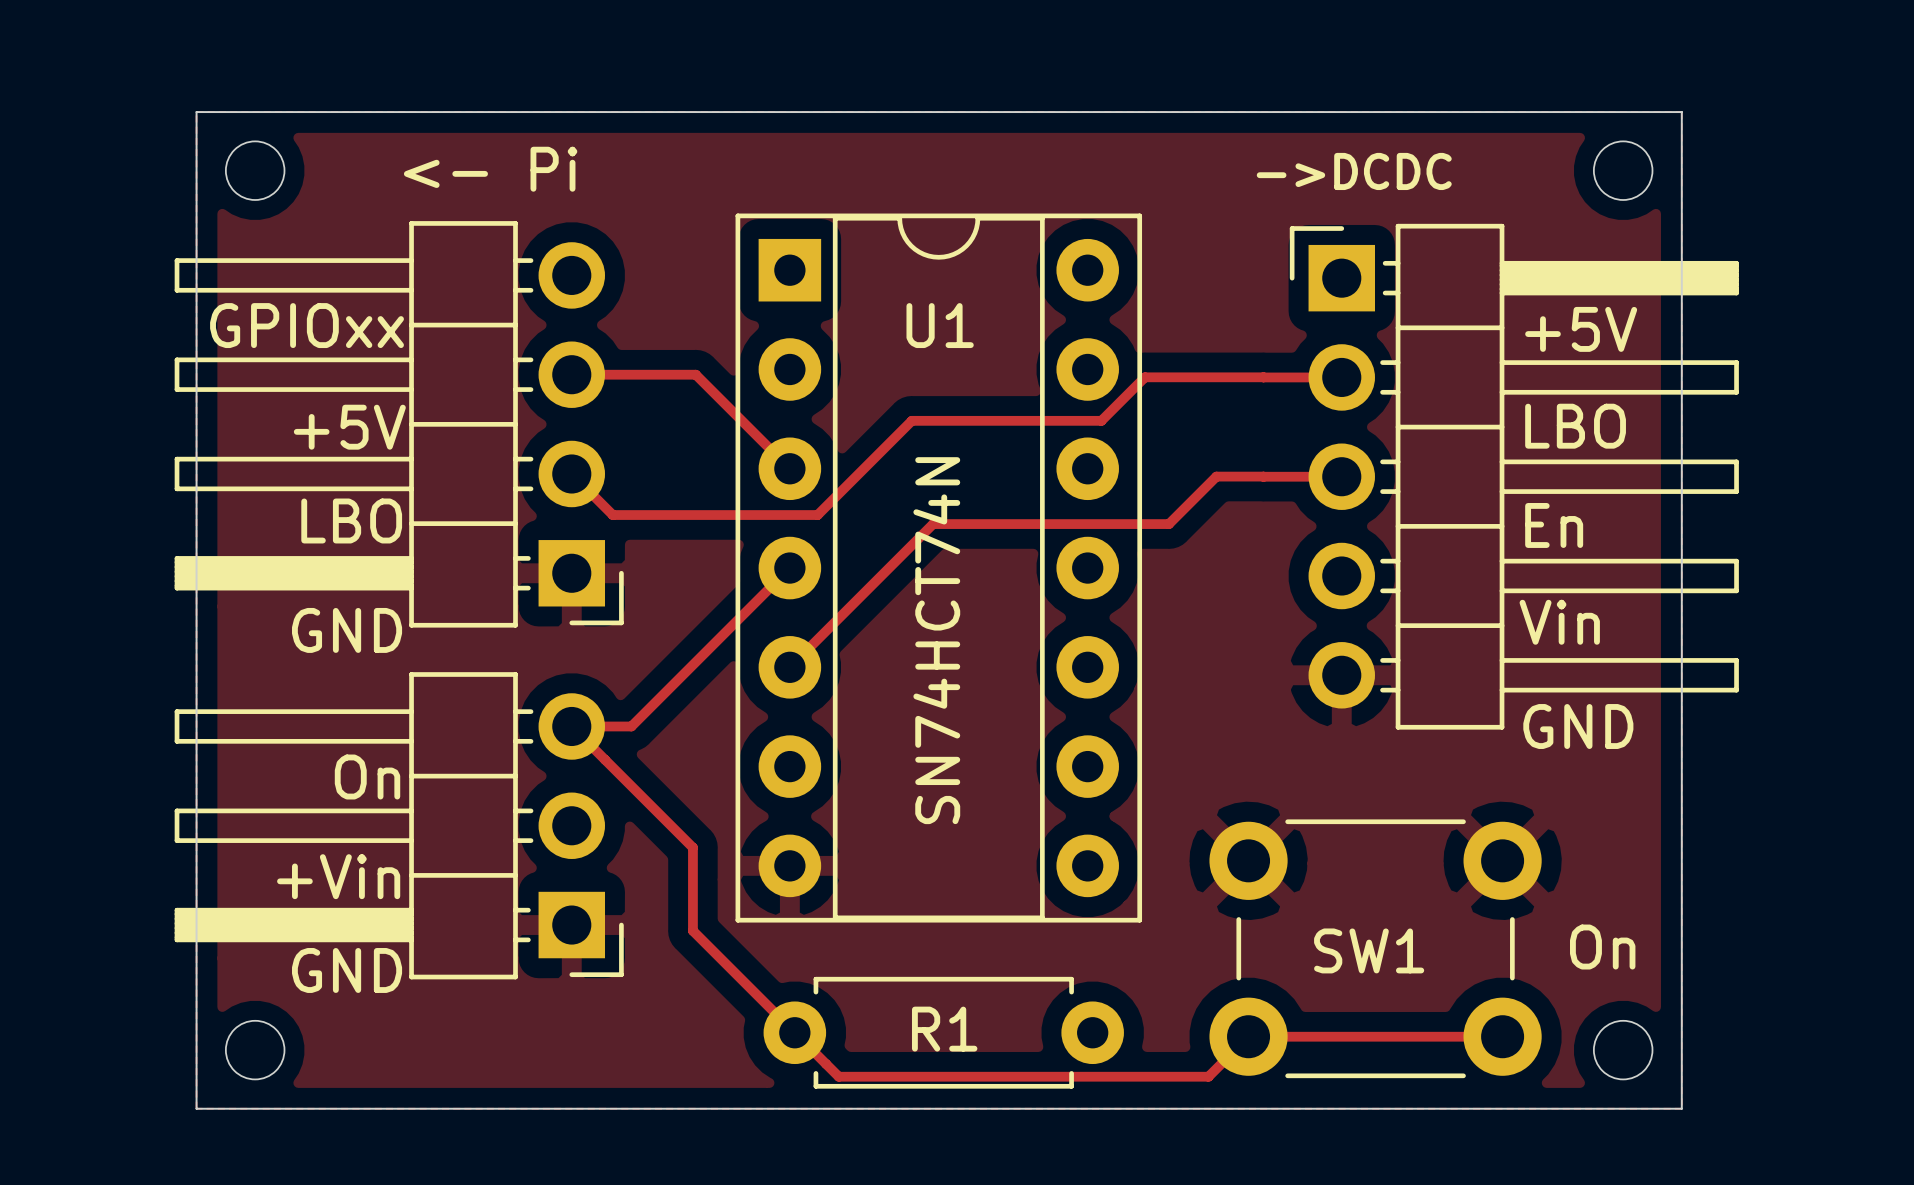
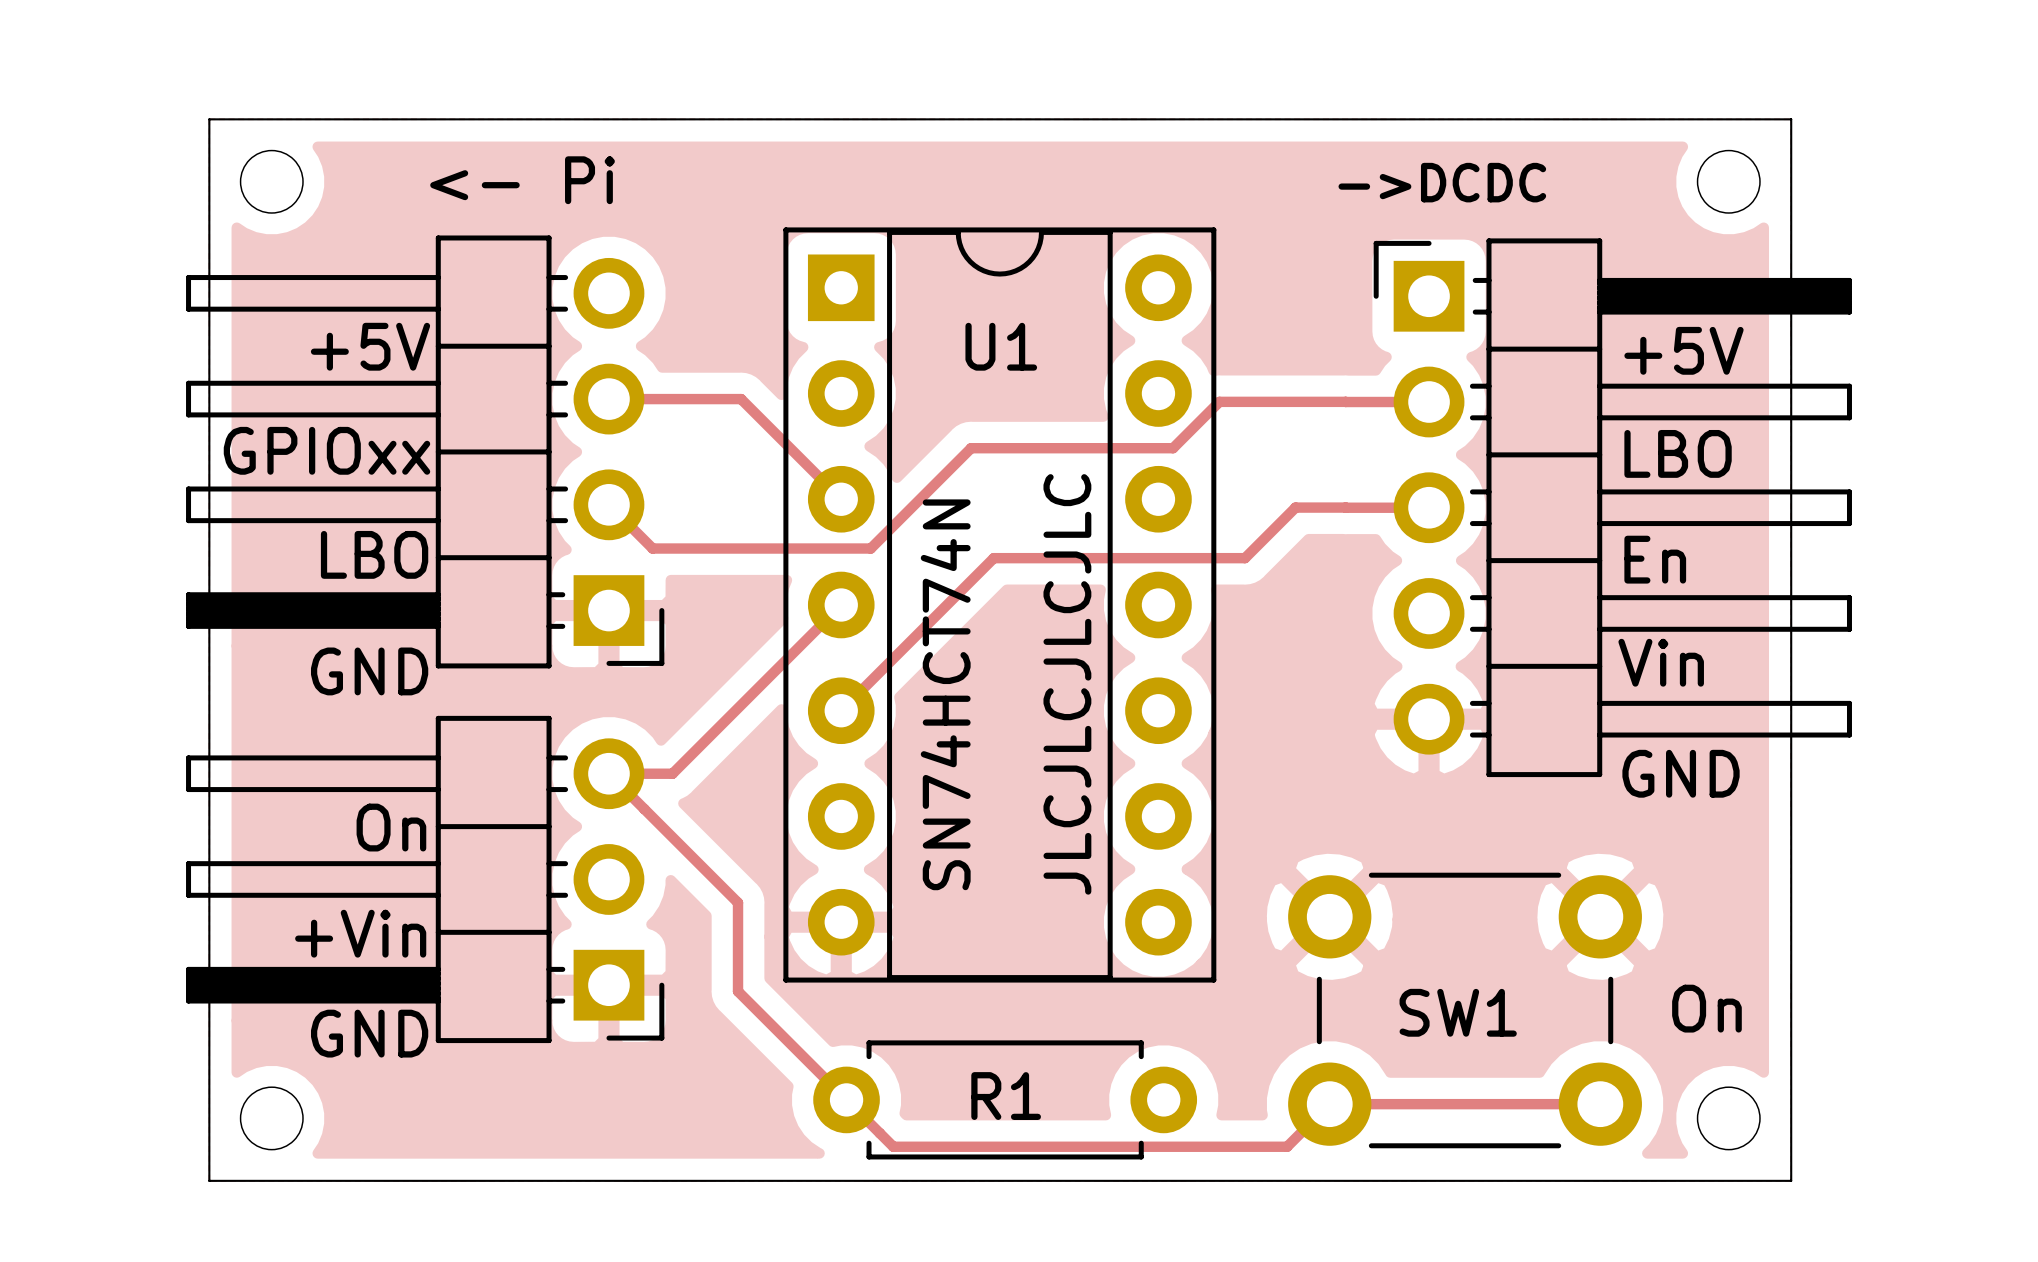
text: GPIOxx (307, 325) -> +5V (370, 346)
text: none -> GPIOxx (326, 450)
text: +5V (349, 427) -> none
text position: SN74HCT74N (936, 640) -> SN74HCT74N (945, 694)
text: none -> JLCJLCJLCJLC (1067, 684)

